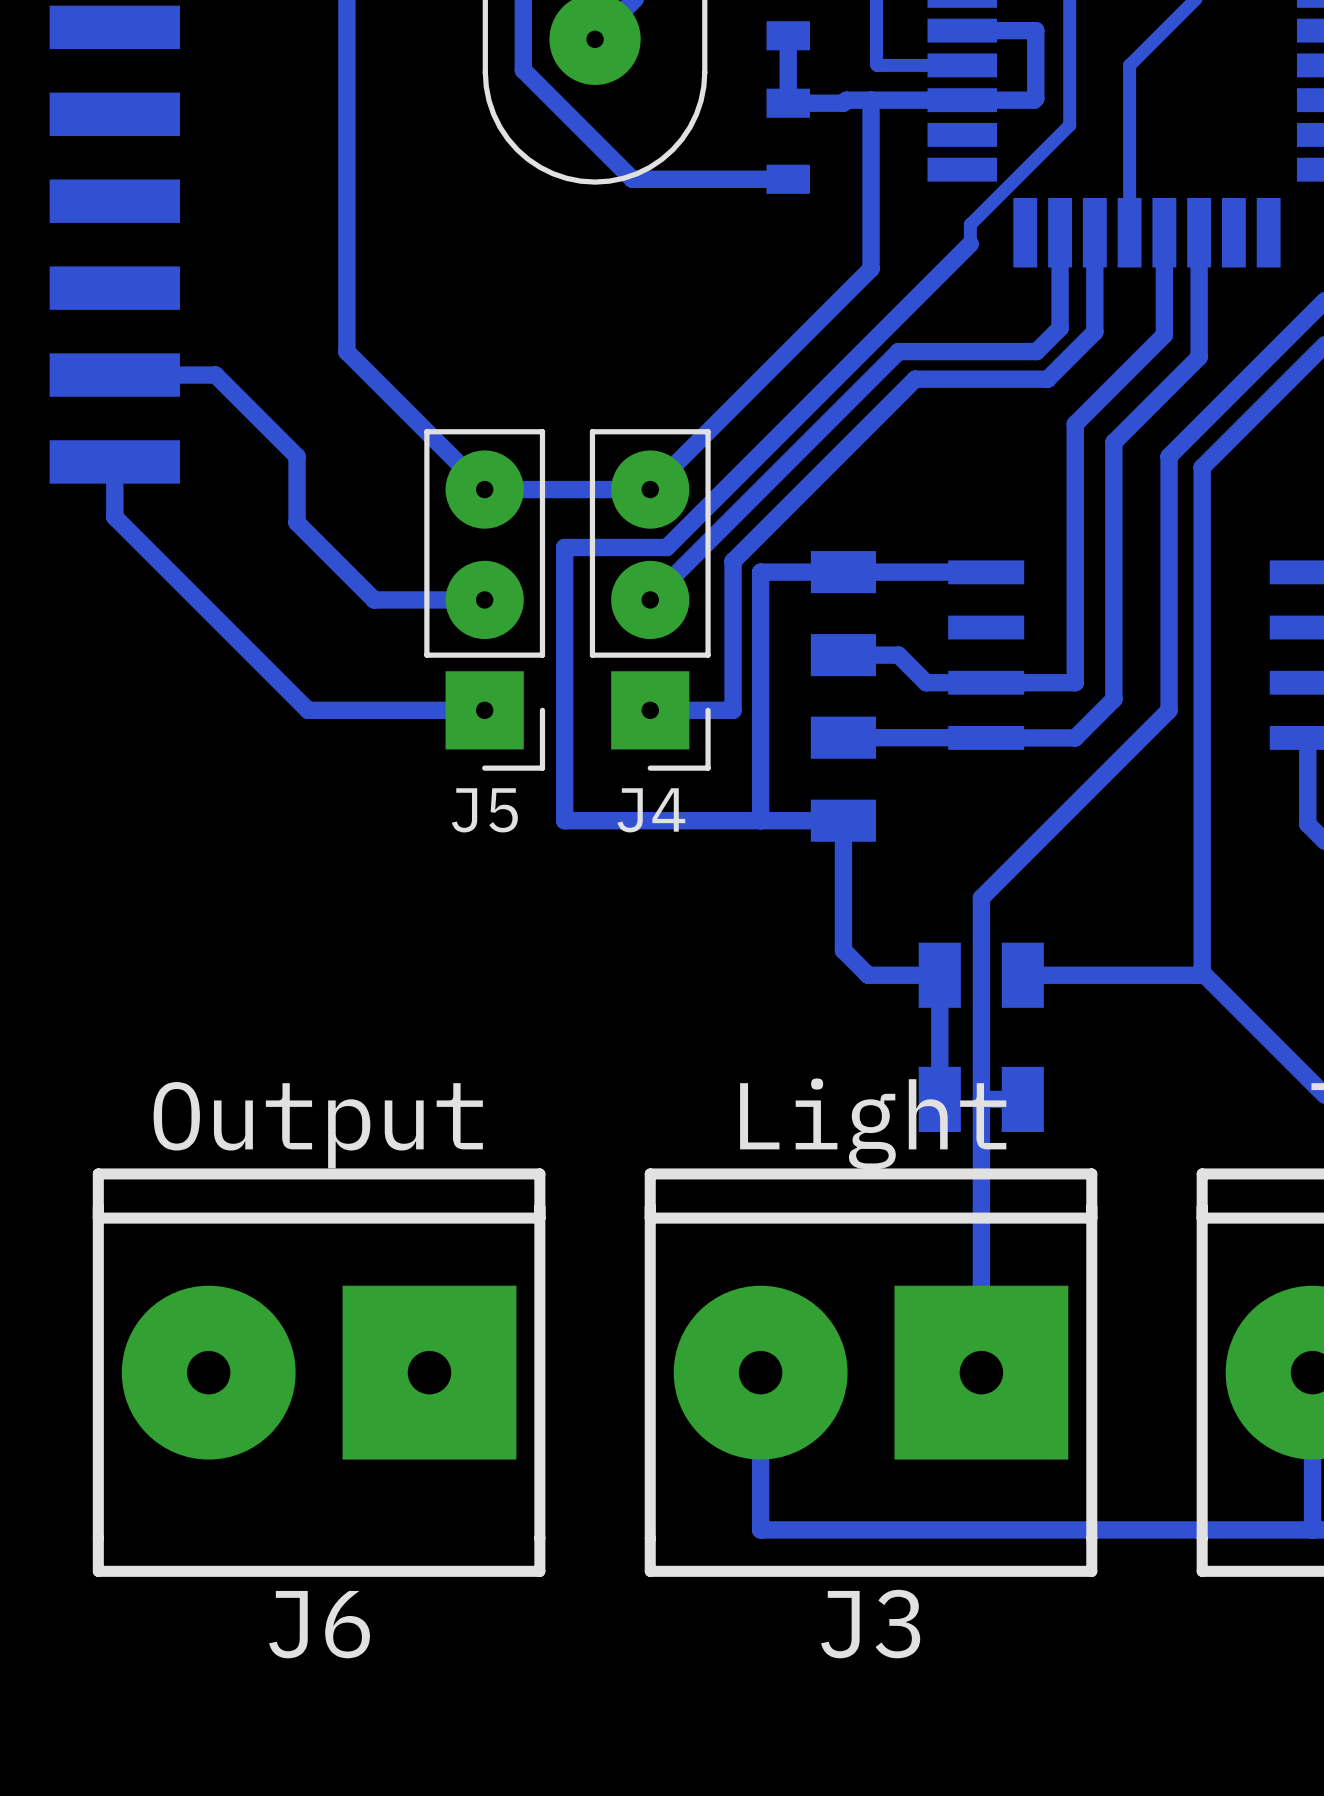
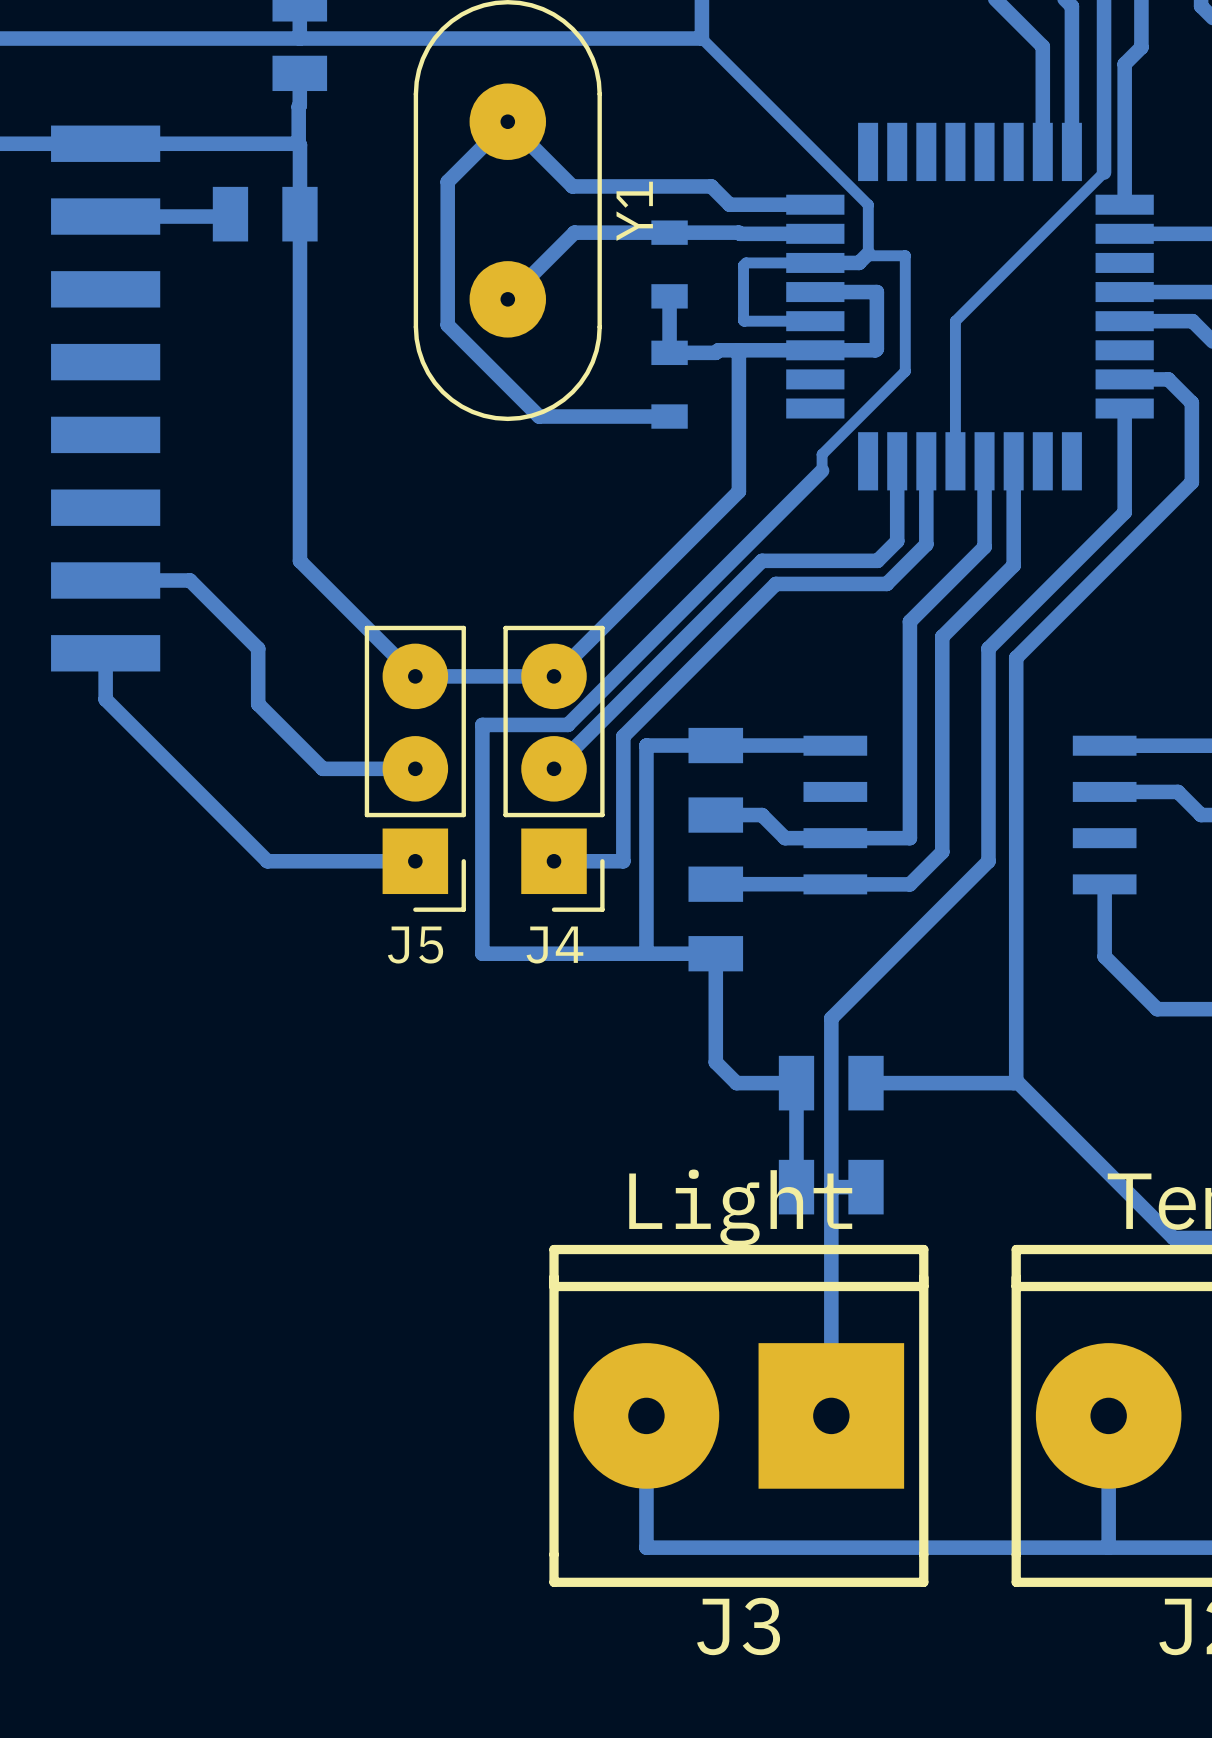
J6: Output (319, 1372) -> none

